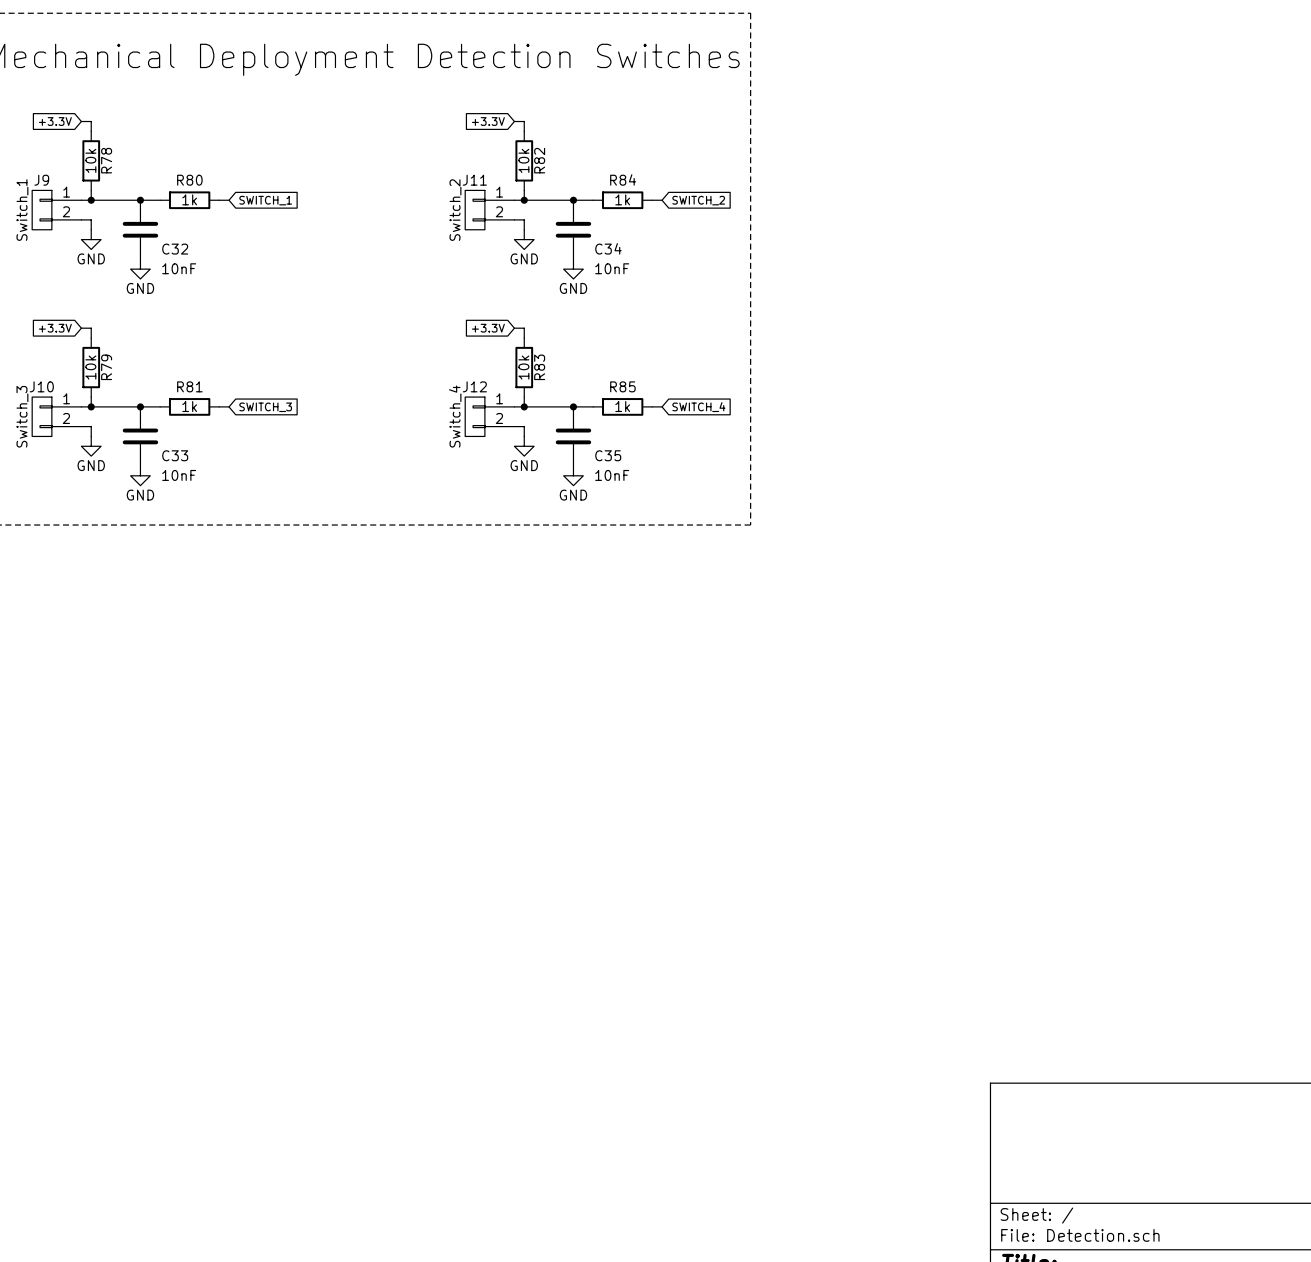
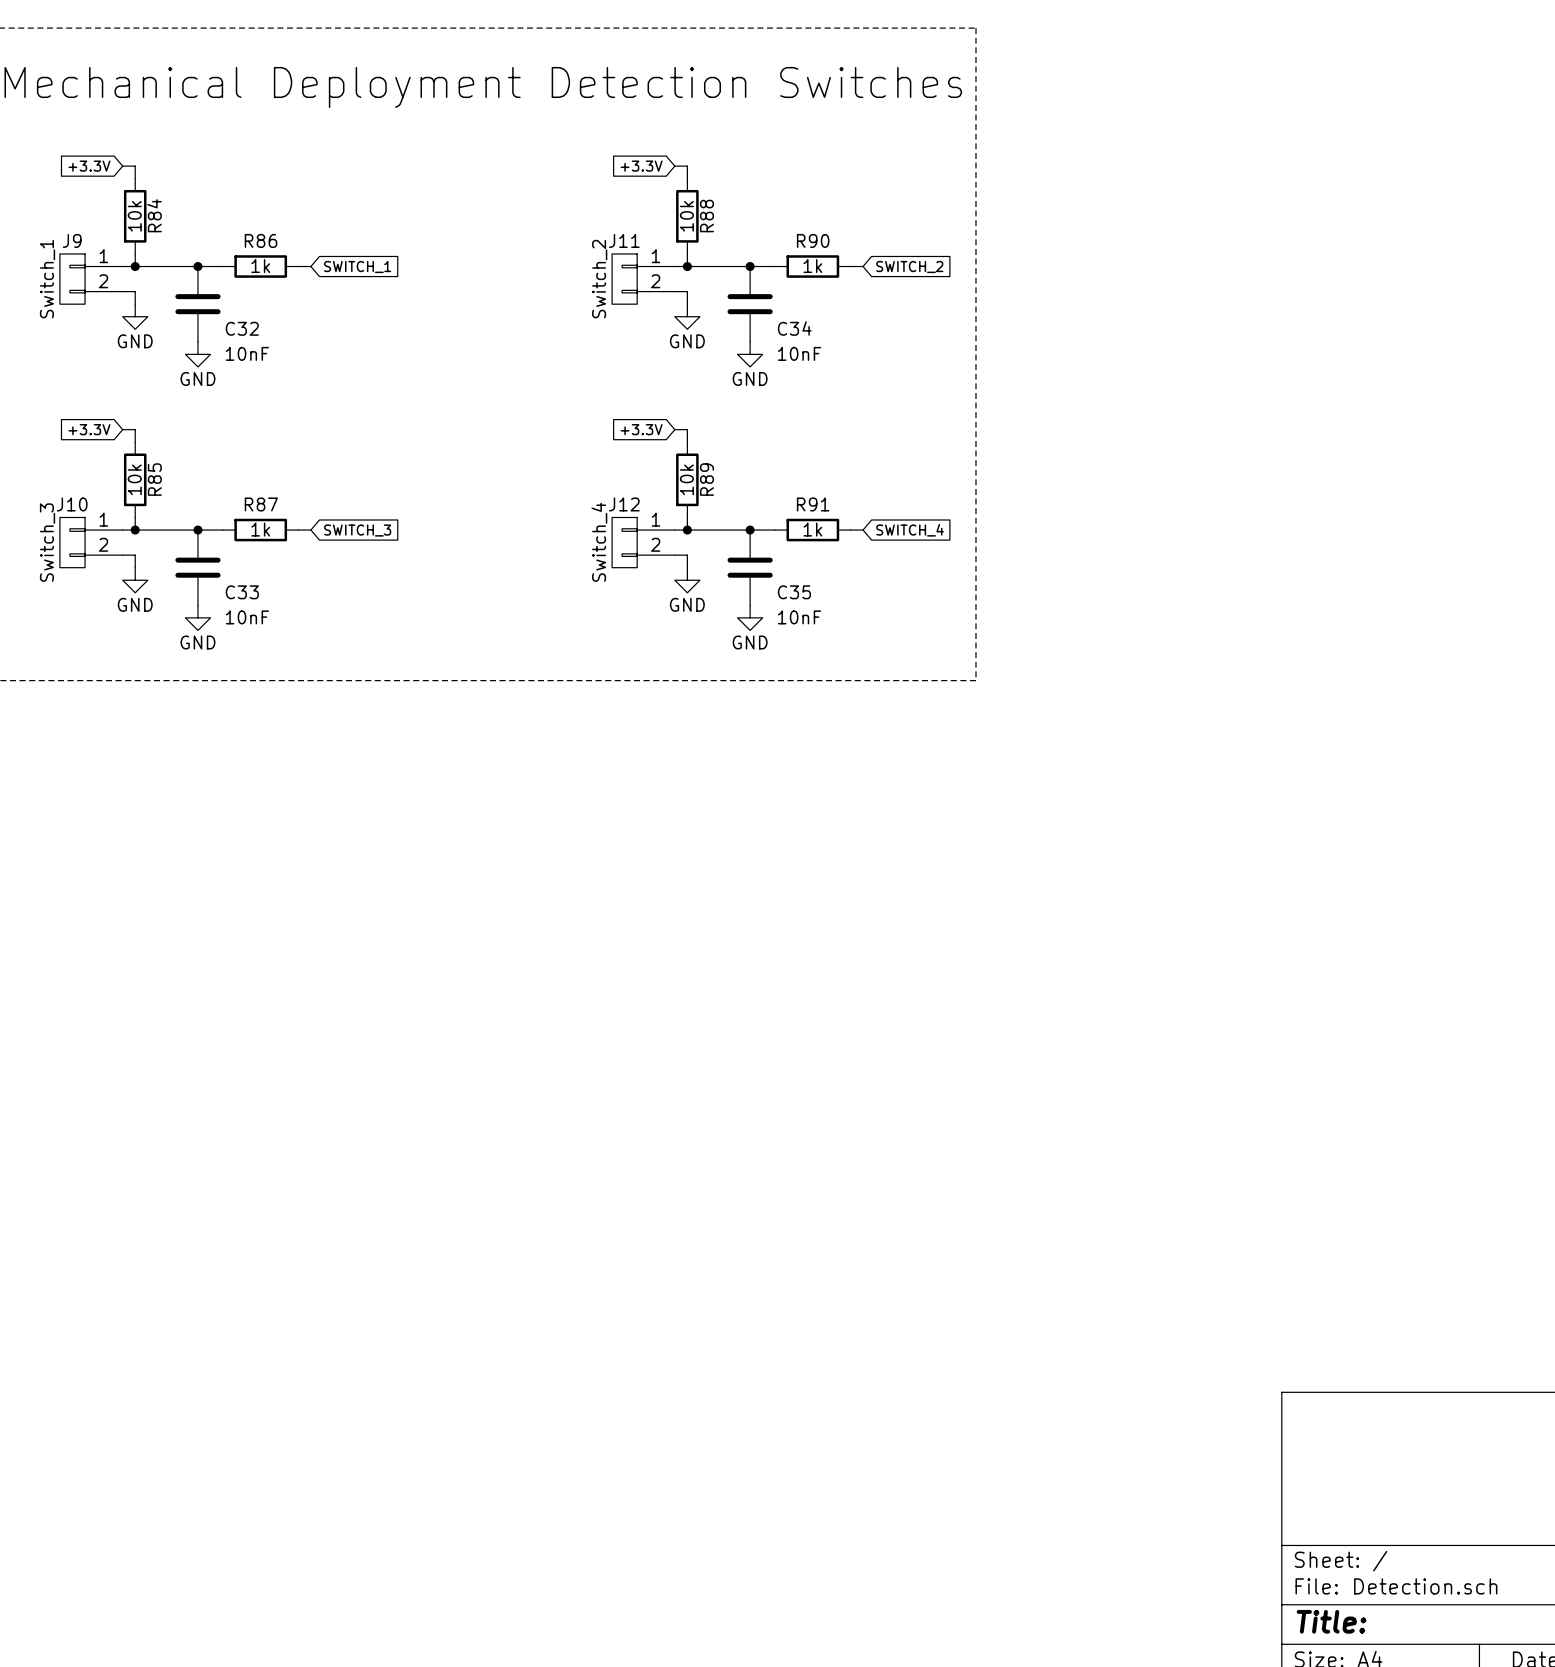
R78 name: R78 (106, 160) -> R84 (154, 215)
R82 name: R82 (539, 160) -> R88 (706, 216)
R84 name: R84 (623, 179) -> R90 (813, 240)
R80 name: R80 (189, 180) -> R86 (261, 240)
R79 name: R79 (106, 367) -> R85 (154, 479)
R83 name: R83 (539, 367) -> R89 (706, 479)
R81 name: R81 (189, 386) -> R87 (261, 504)
R85 name: R85 (622, 386) -> R91 (813, 504)

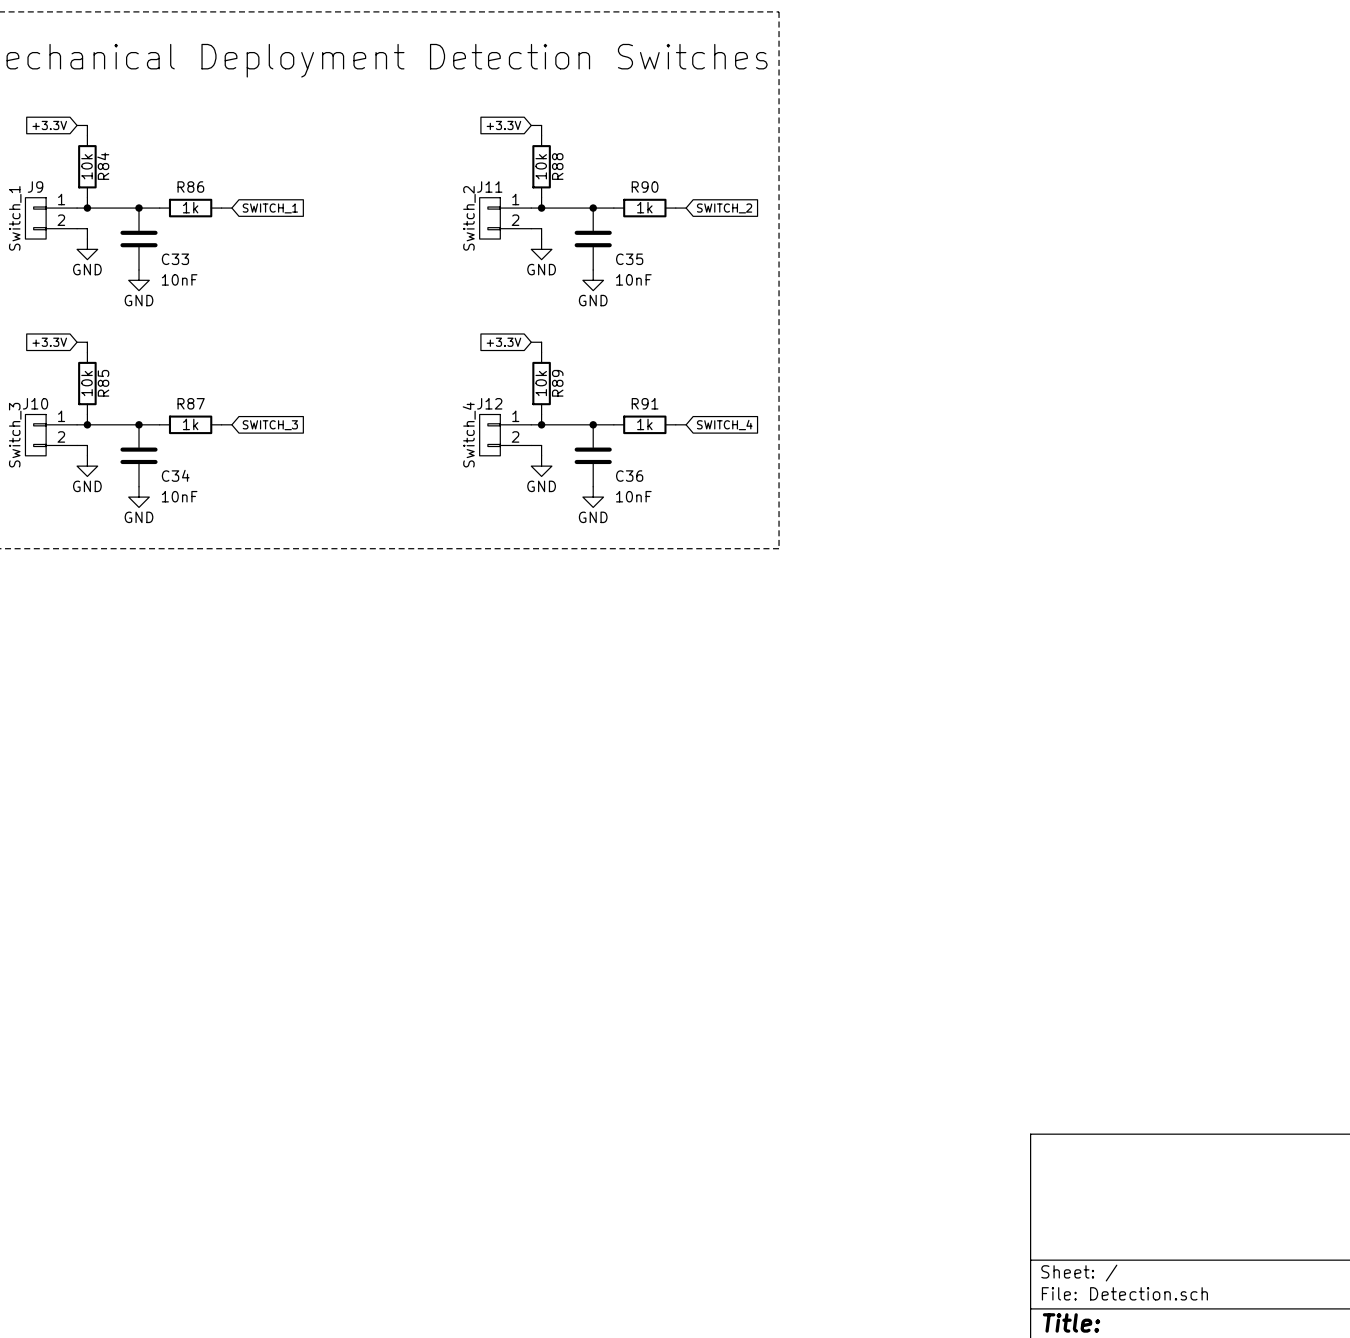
C32 name: C32 (242, 328) -> C33 (175, 259)
C34 name: C34 (794, 328) -> C35 (629, 259)
C33 name: C33 (242, 592) -> C34 (175, 475)
C35 name: C35 (794, 592) -> C36 (629, 476)

